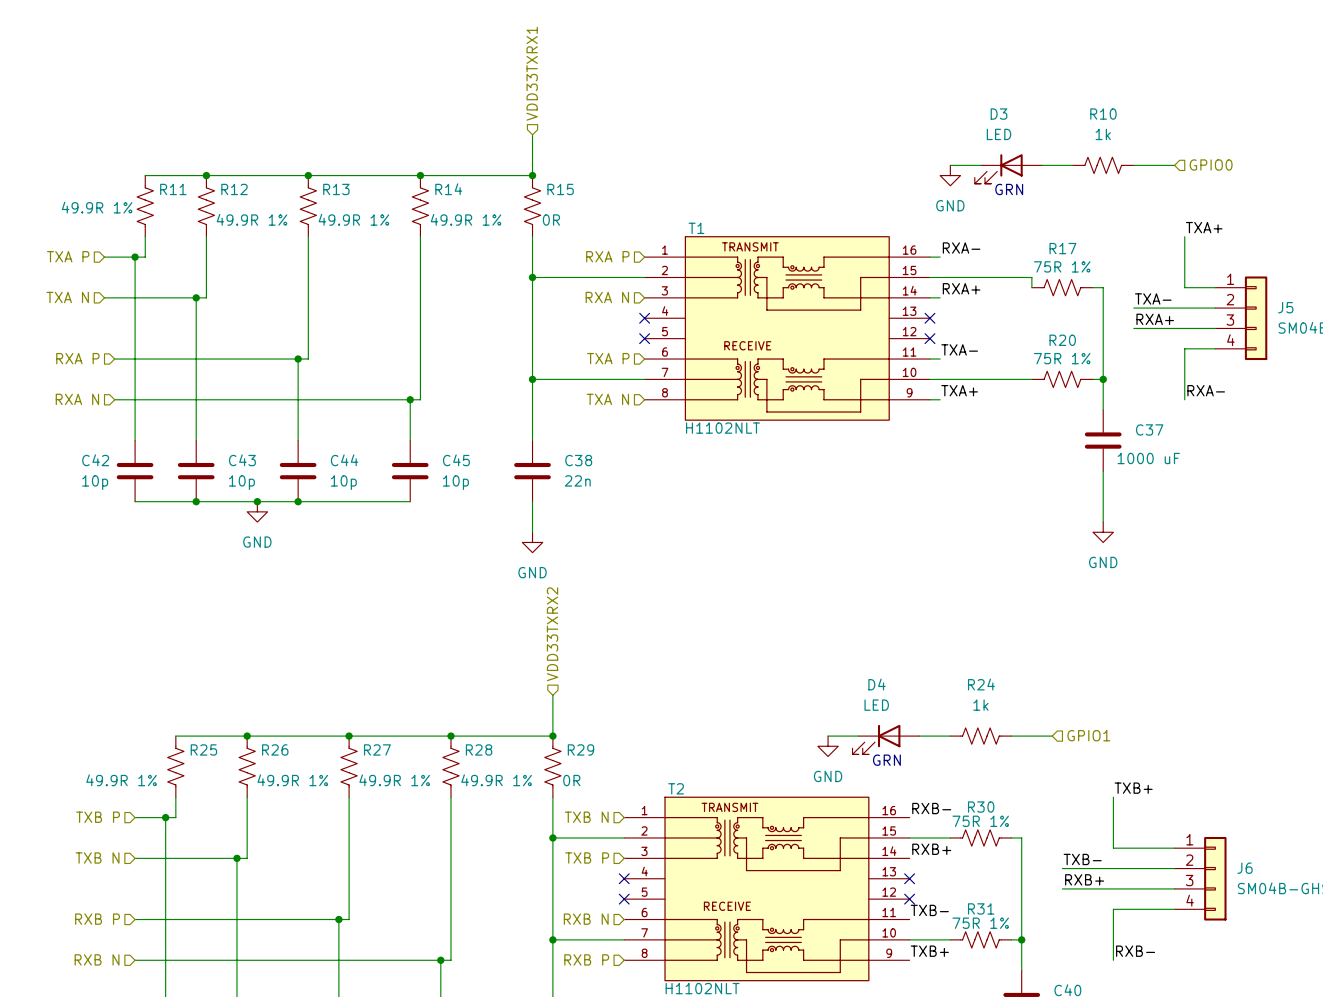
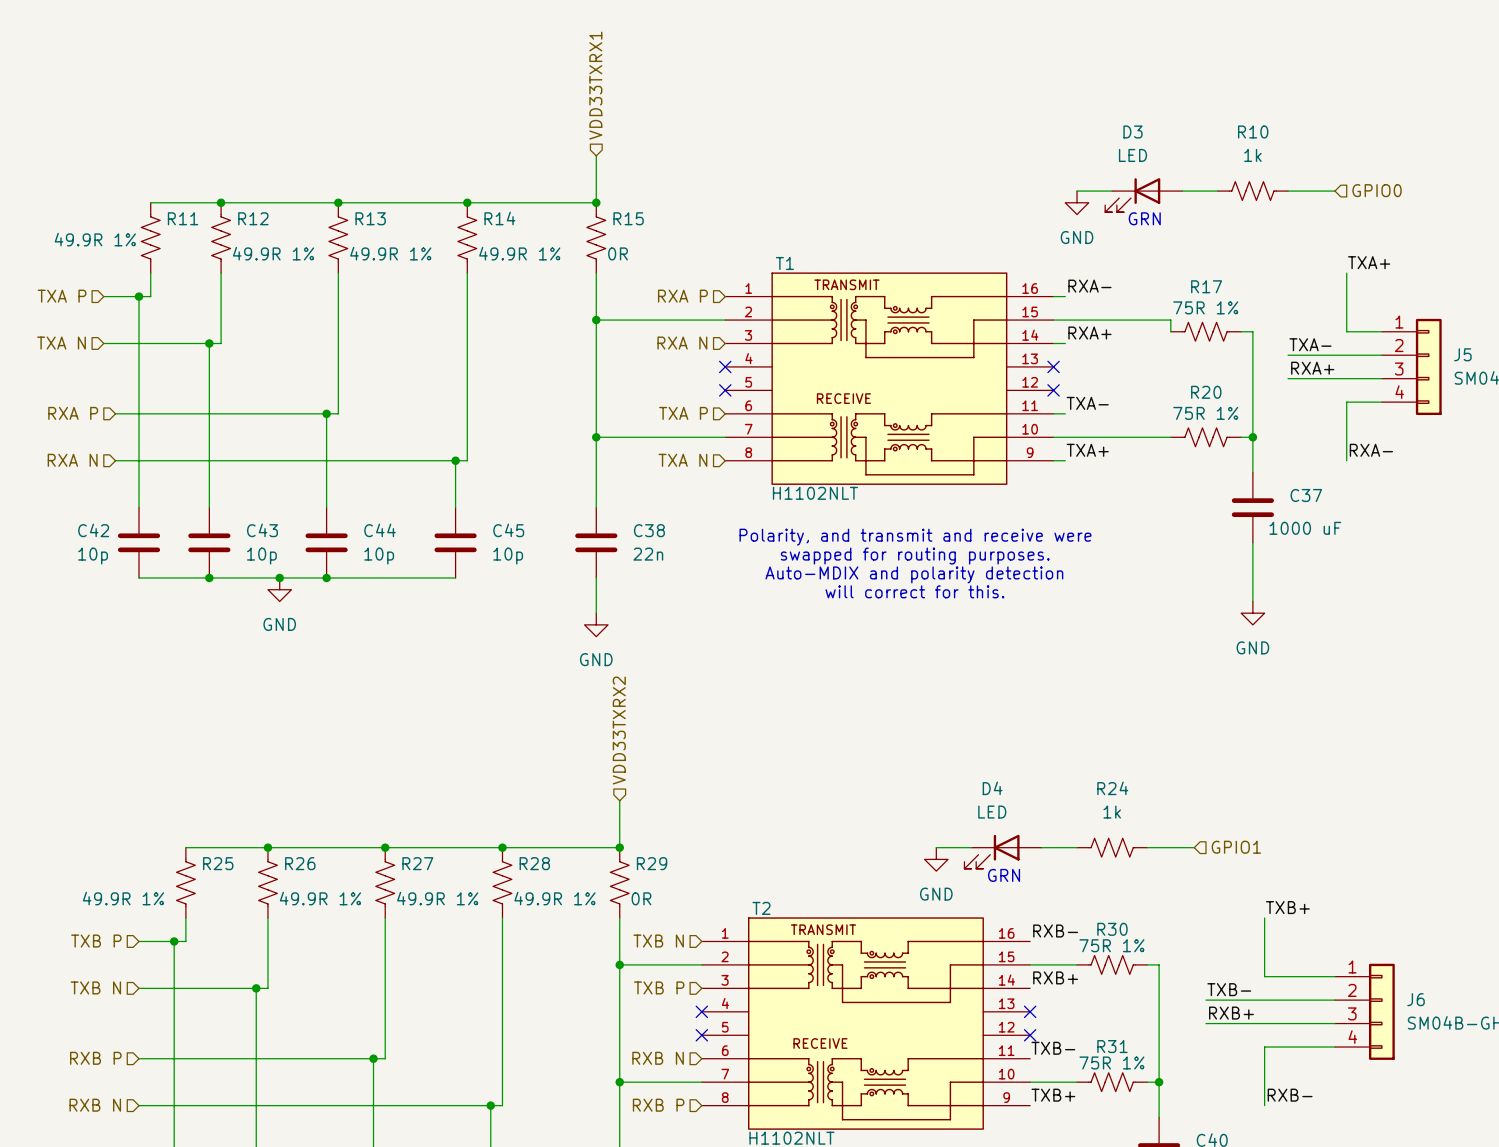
text: none -> Polarity, and transmit and receive were (915, 537)
text: none -> swapped for routing purposes. (915, 556)
text: none -> Auto-MDIX and polarity detection (914, 574)
text: none -> will correct for this. (914, 591)

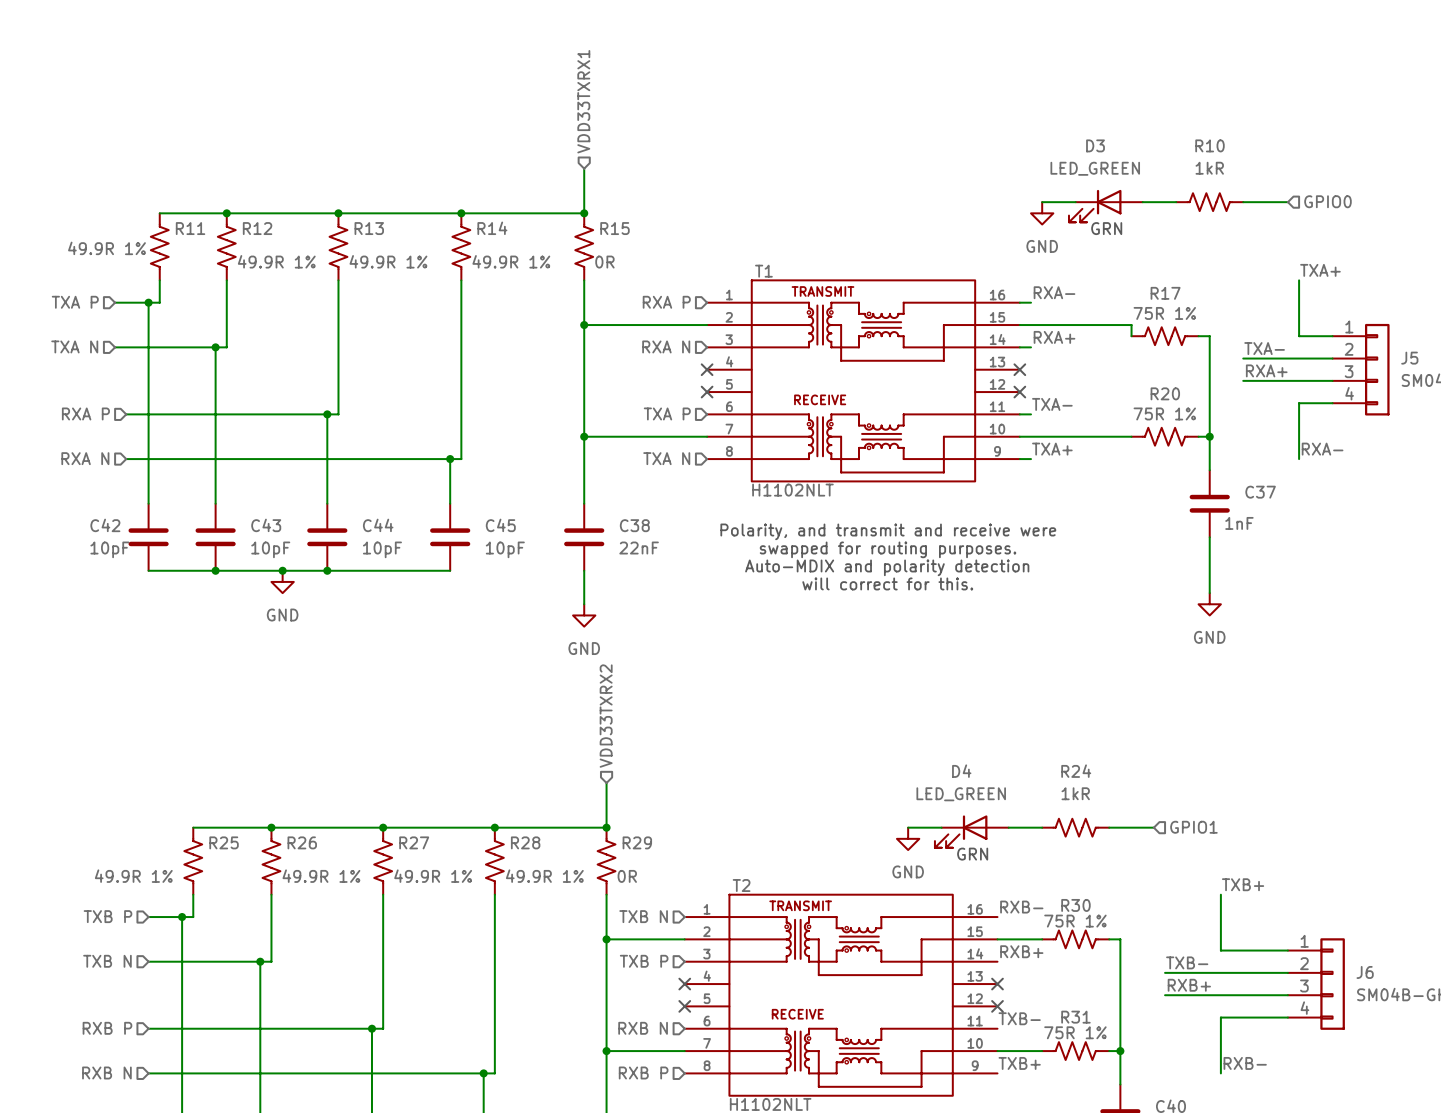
D3 value: LED (1132, 155) -> LED_GREEN (1095, 168)
R10 value: 1k (1252, 155) -> 1kR (1209, 168)
C37 value: 1000 uF (1305, 528) -> 1nF (1239, 523)
C38 value: 22n (648, 554) -> 22nF (639, 548)
C42 value: 10p (93, 556) -> 10pF (109, 549)
C43 value: 10p (261, 556) -> 10pF (270, 549)
C44 value: 10p (379, 556) -> 10pF (382, 549)
C45 value: 10p (508, 556) -> 10pF (505, 549)
D4 value: LED (992, 812) -> LED_GREEN (961, 794)
R24 value: 1k (1112, 812) -> 1kR (1075, 793)

